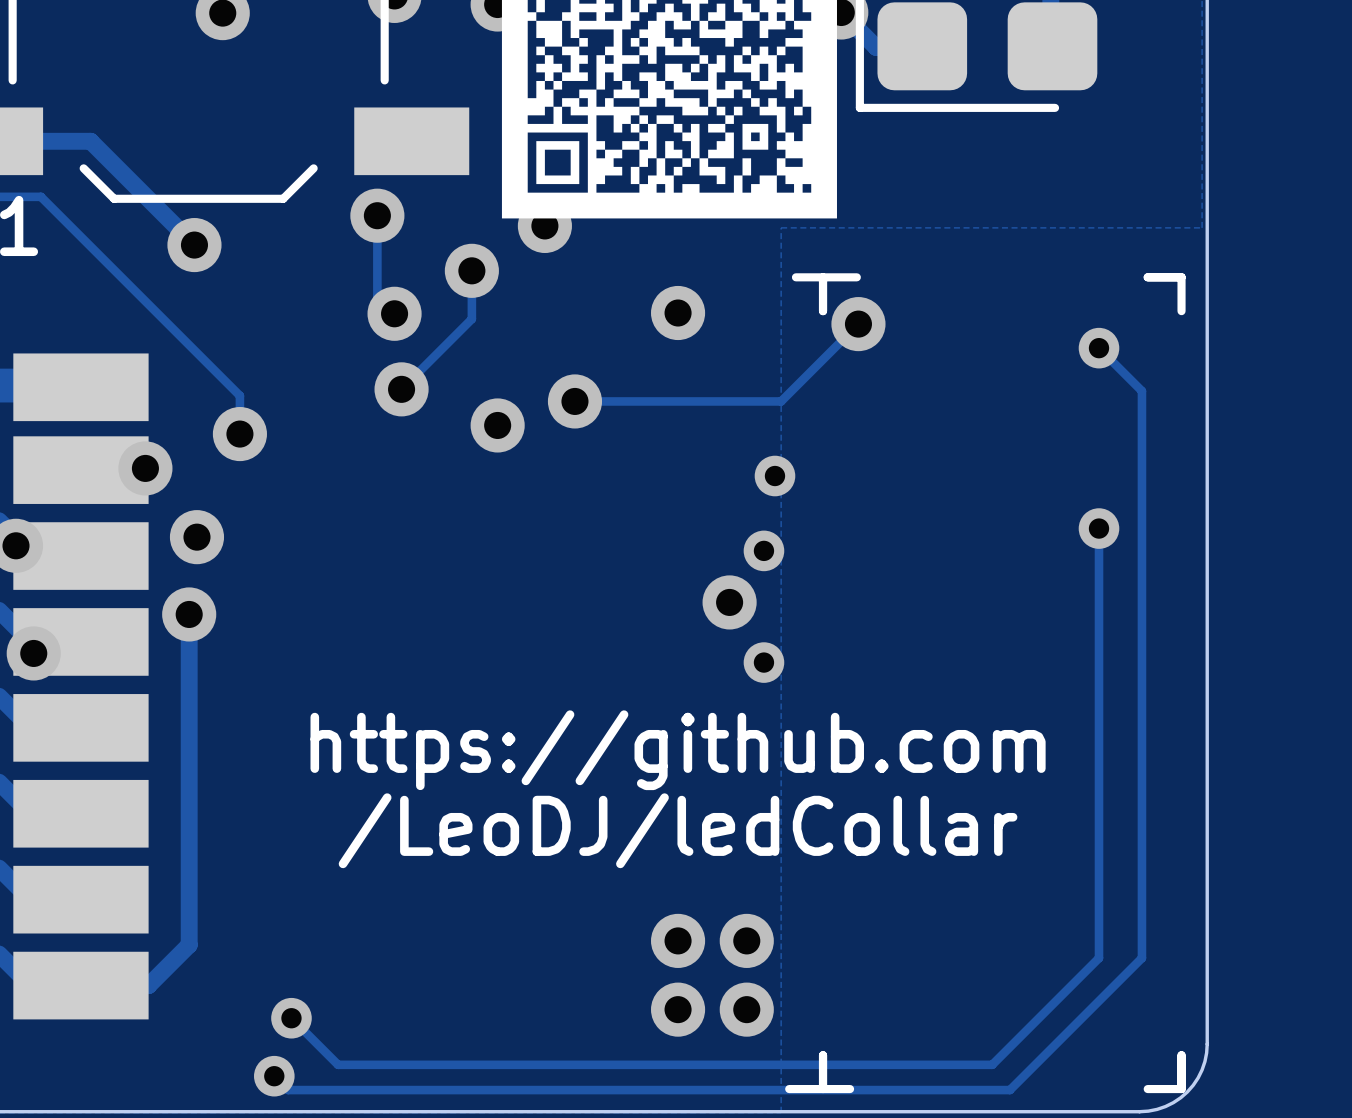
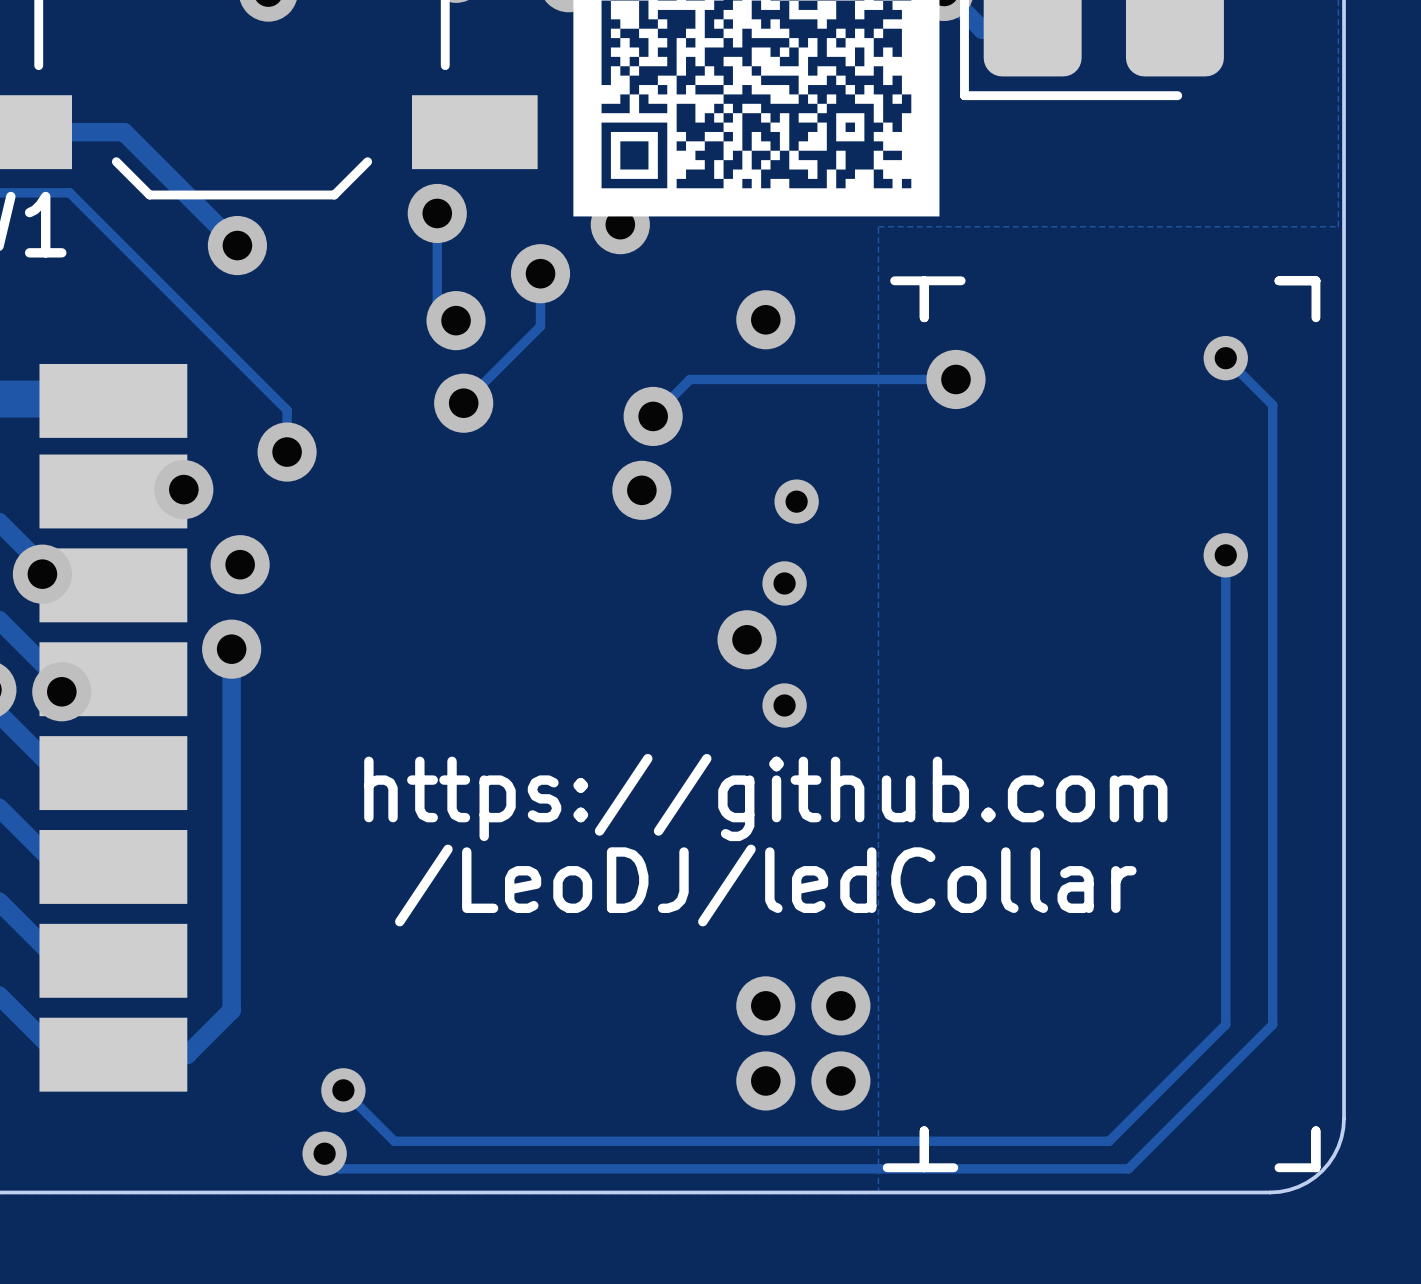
track: (858, 324) (781, 401) (574, 401) -> (955, 379) (690, 379) (653, 416)
via position: (858, 324) -> (955, 379)
via position: (497, 425) -> (641, 490)
via: (774, 476) -> none
via: none -> (796, 501)
via: (763, 550) -> none
via: none -> (784, 583)
via position: (729, 602) -> (747, 639)
via: (763, 662) -> none
via: none -> (784, 705)

